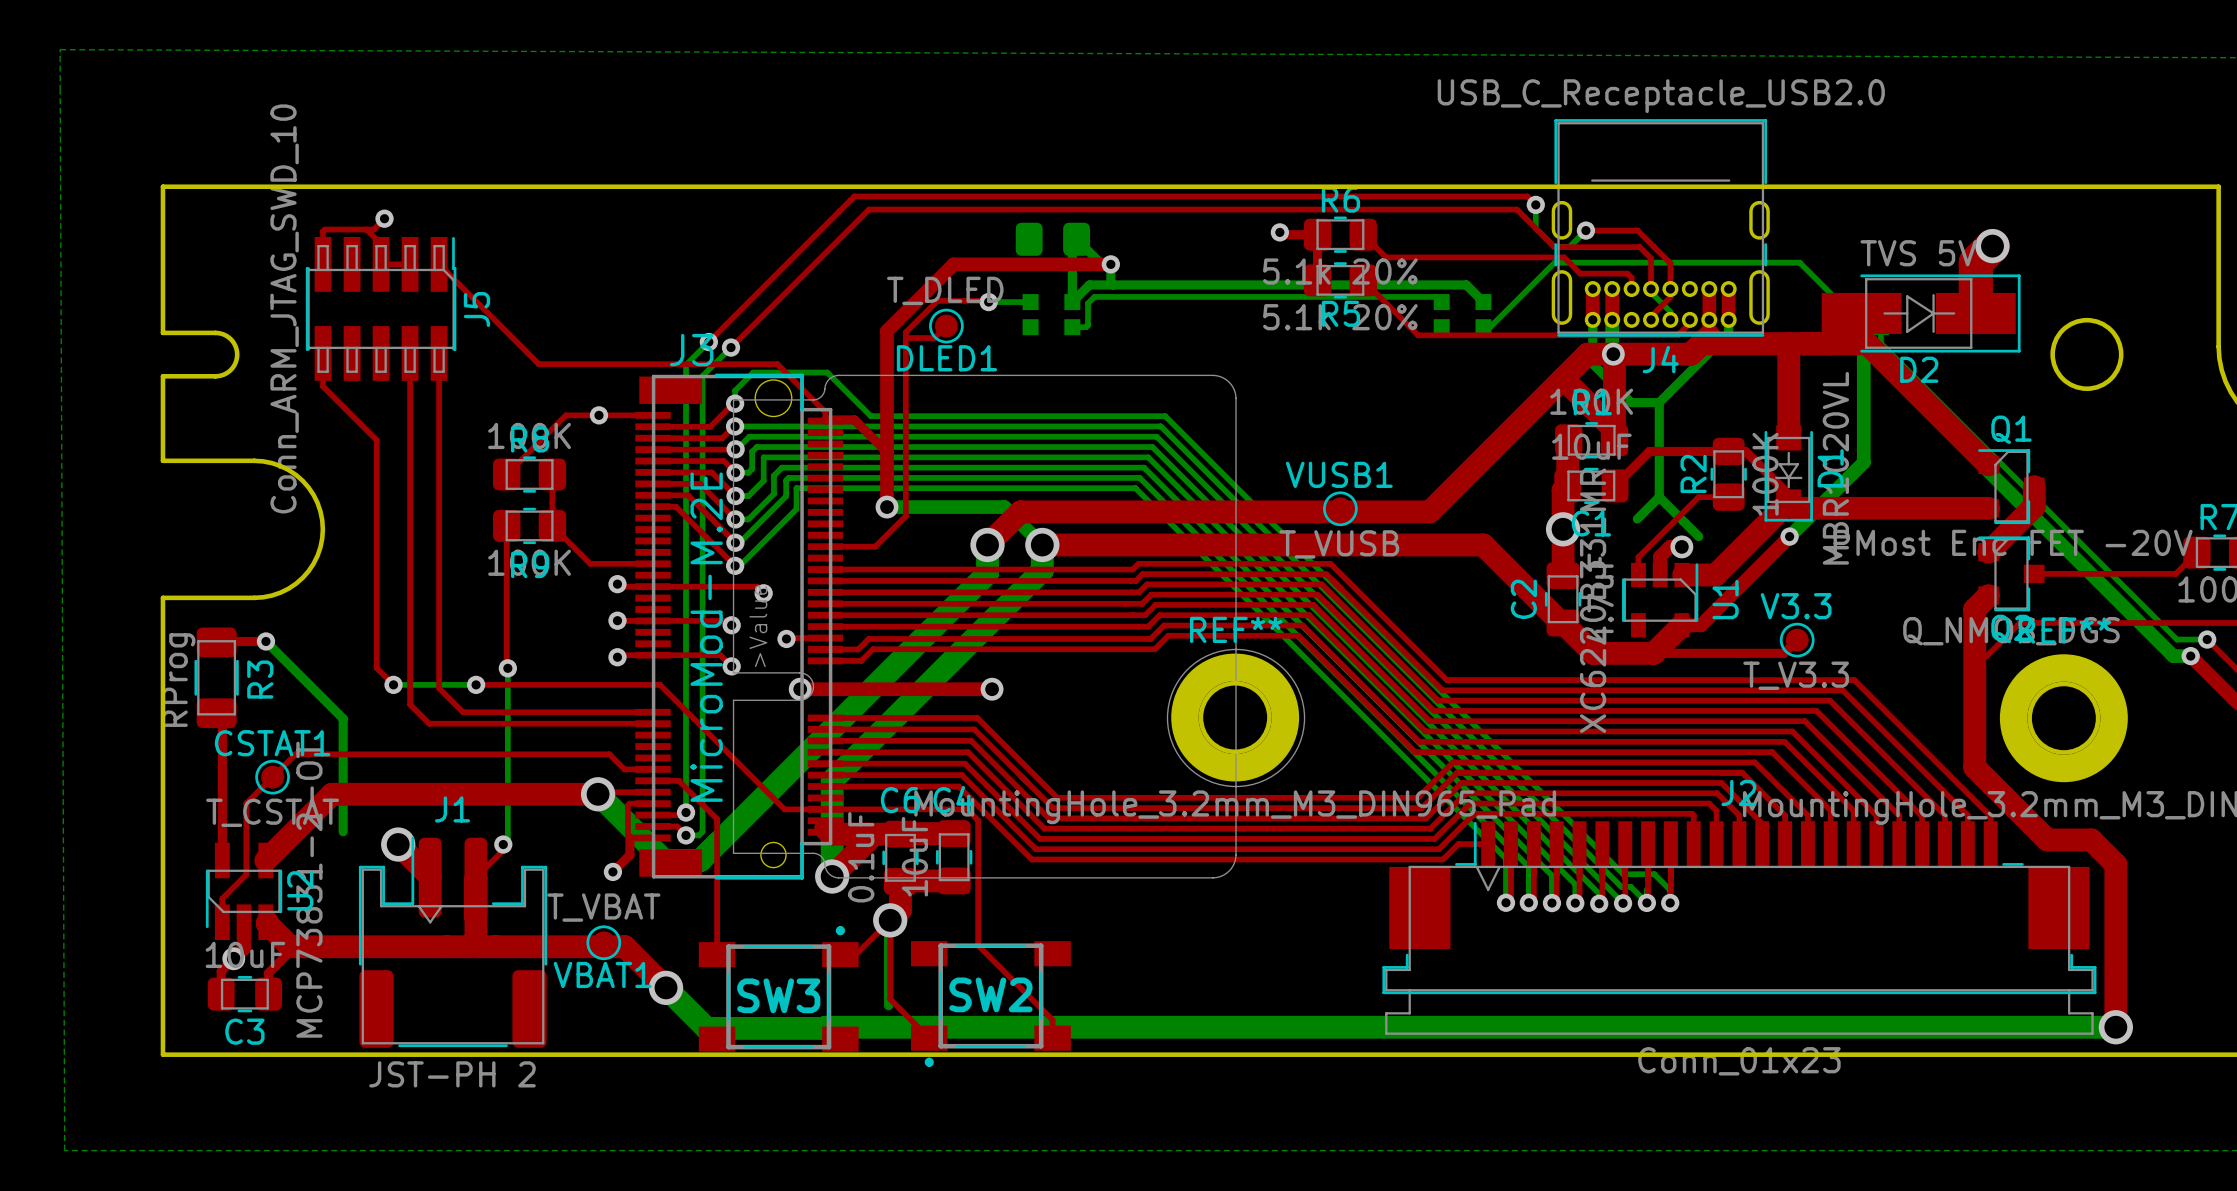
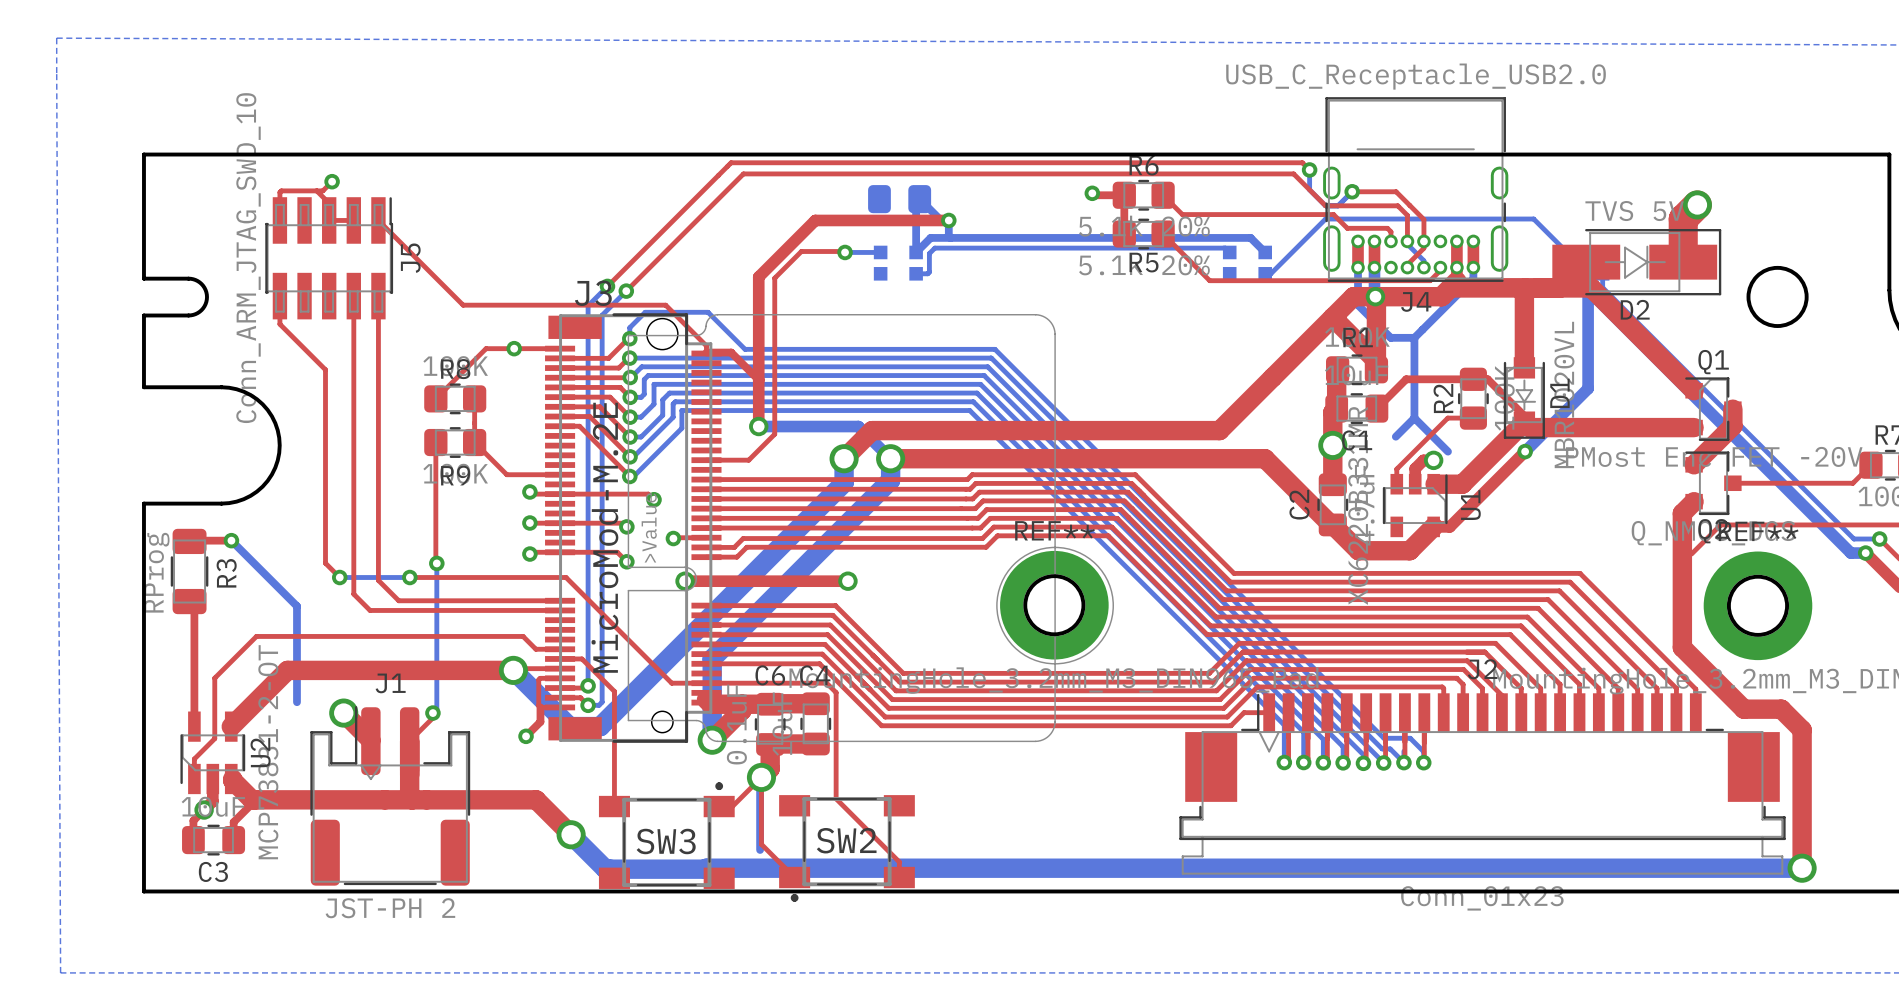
top track: (946, 326) (934, 338) (905, 338) -> none
DLED1: T_DLED (946, 326) -> none
VUSB1: T_VUSB (1340, 508) -> none
top track: (1797, 640) (1783, 653) (1653, 653) -> none
V3.3: T_V3.3 (1797, 640) -> none
CSTAT1: T_CSTAT (272, 777) -> none
VBAT1: T_VBAT (603, 942) -> none

